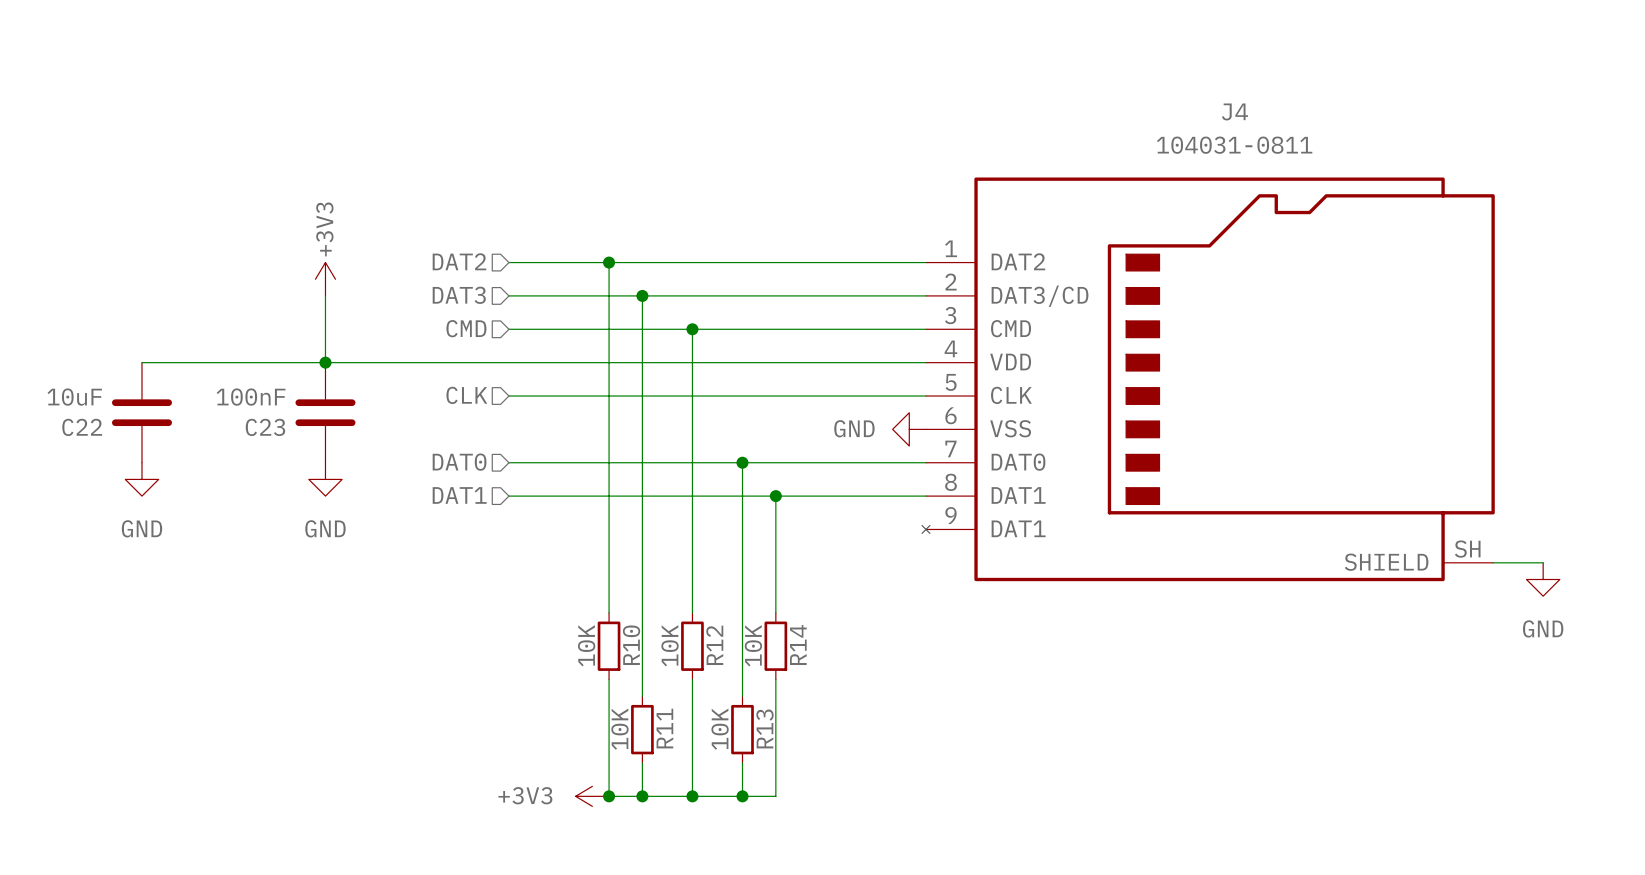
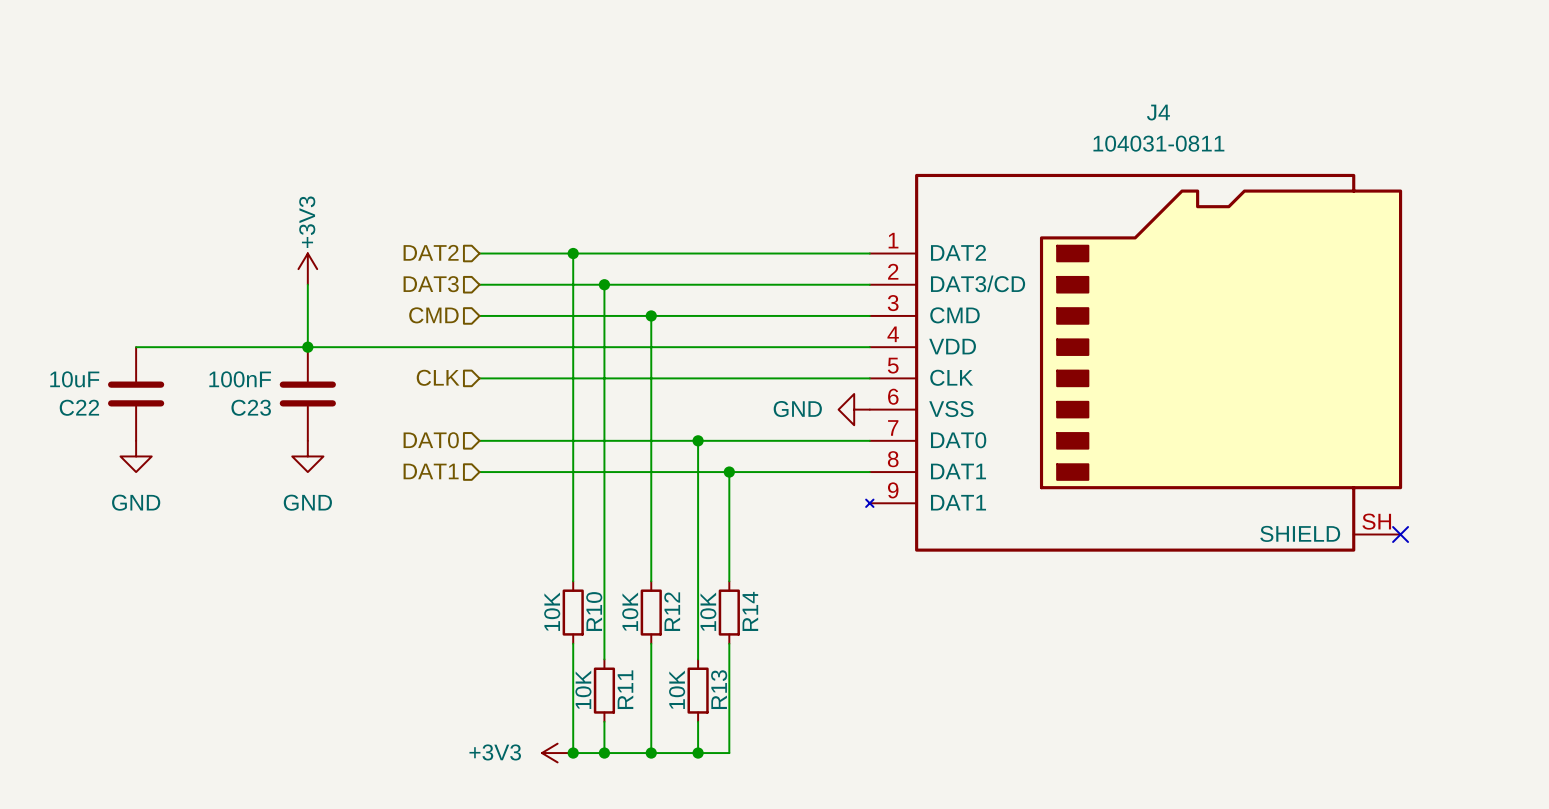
wire: (1493, 562) (1543, 562) -> none
no-connect mark: none -> (1400, 534)
power symbol: GND (1543, 579) -> none

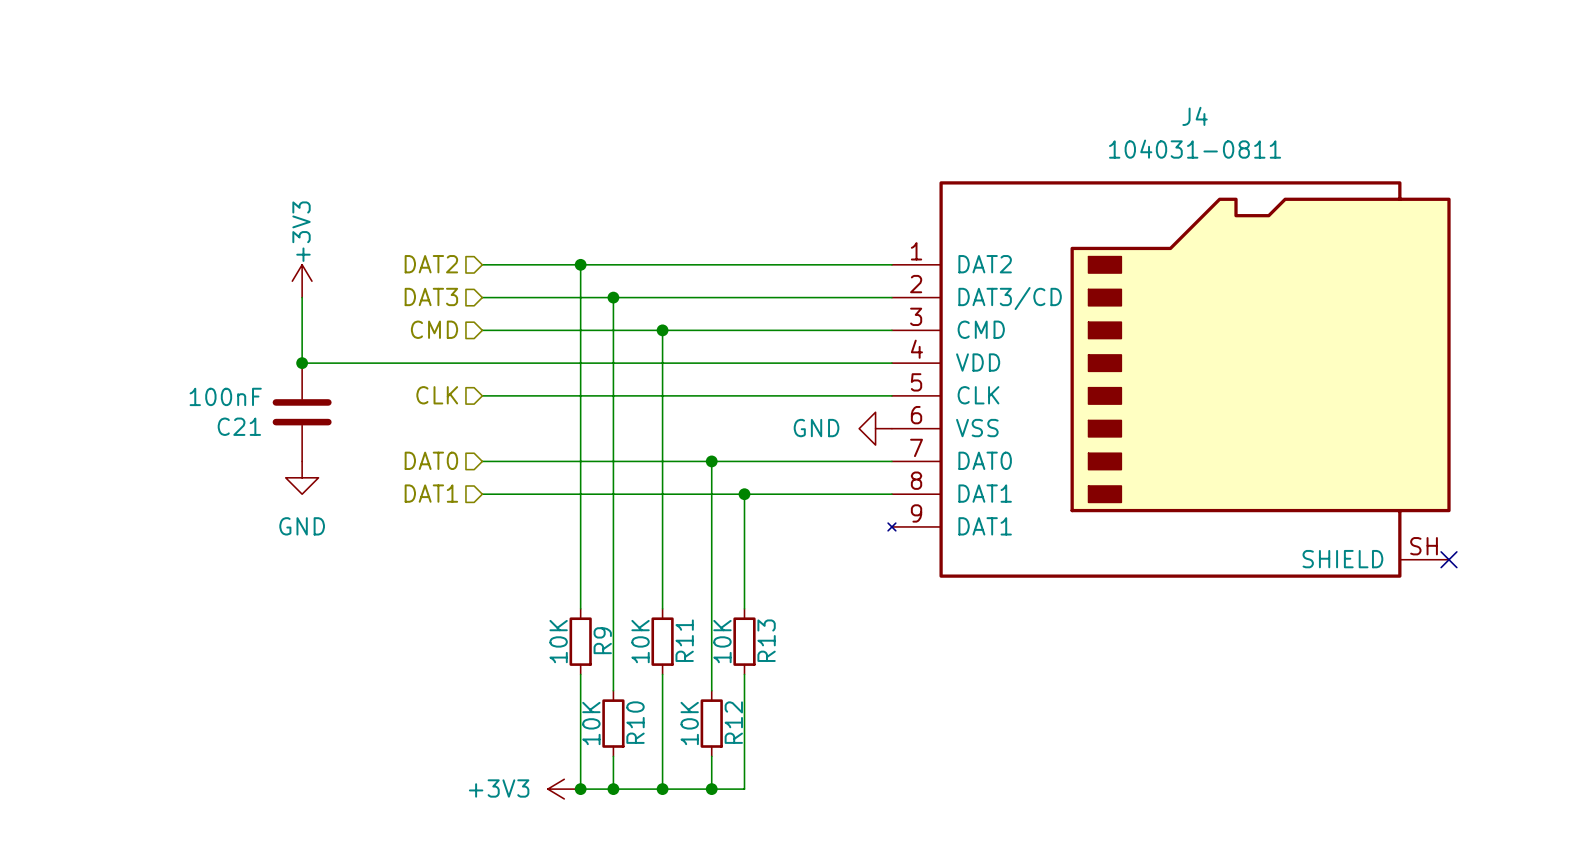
wire: (136, 347) (307, 347) -> none
C22: 10uF (136, 394) -> none
C23 name: C23 (251, 407) -> C21 (239, 426)
power symbol: GND (136, 456) -> none
R10 name: R10 (594, 611) -> R9 (602, 640)
R12 name: R12 (672, 611) -> R11 (684, 640)
R14 name: R14 (750, 611) -> R13 (766, 640)
R11 name: R11 (625, 689) -> R10 (635, 722)
R13 name: R13 (719, 689) -> R12 (733, 722)

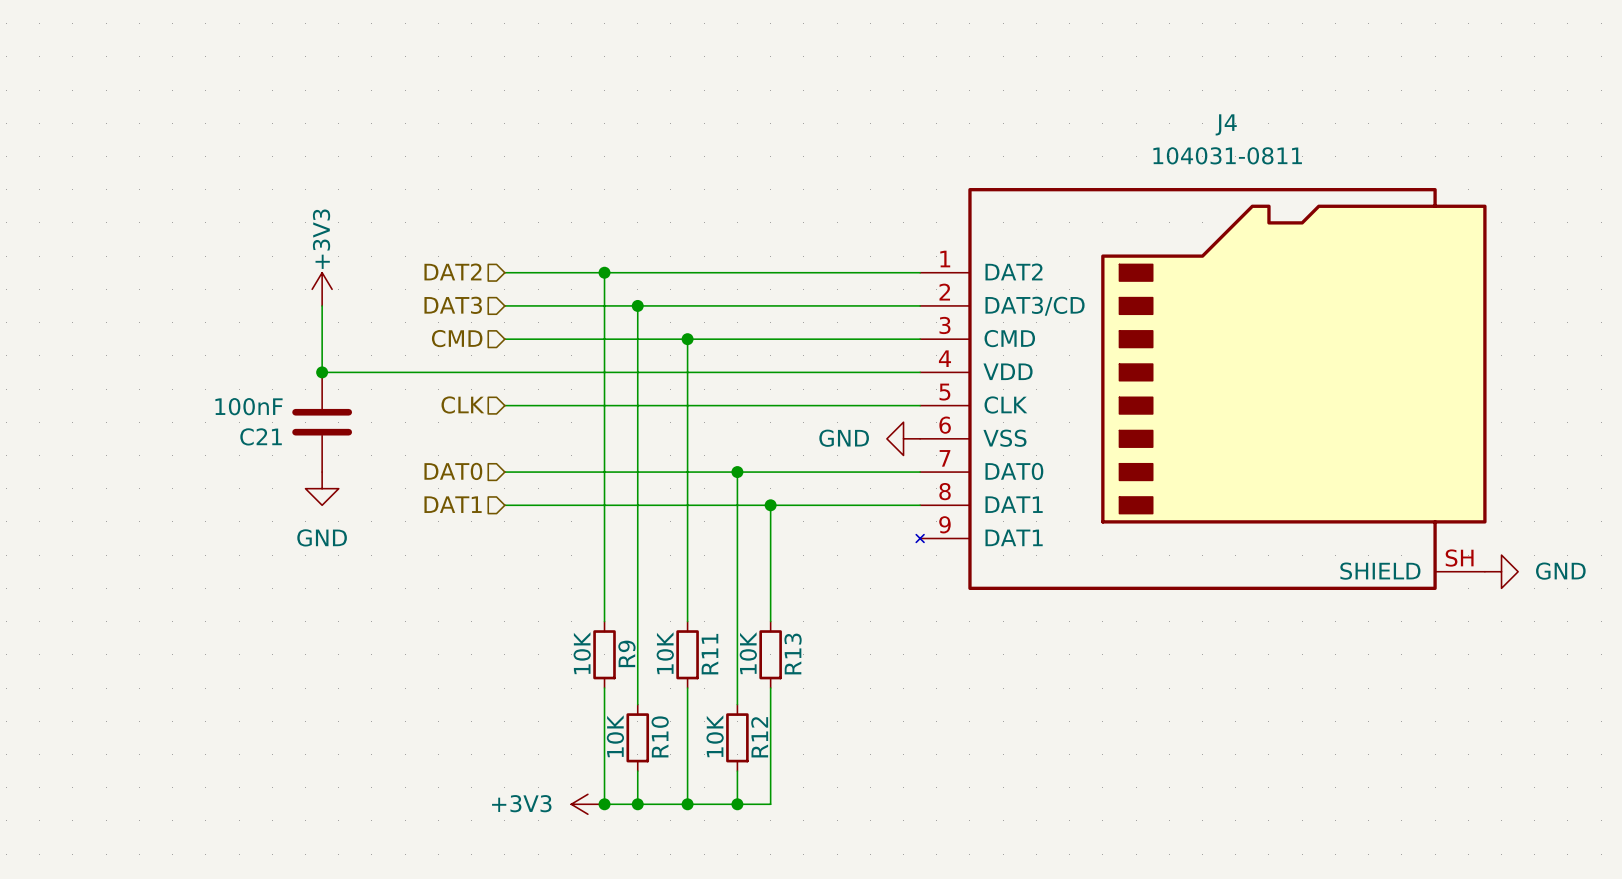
no-connect mark: (1448, 559) -> none
power symbol: none -> GND (1501, 571)

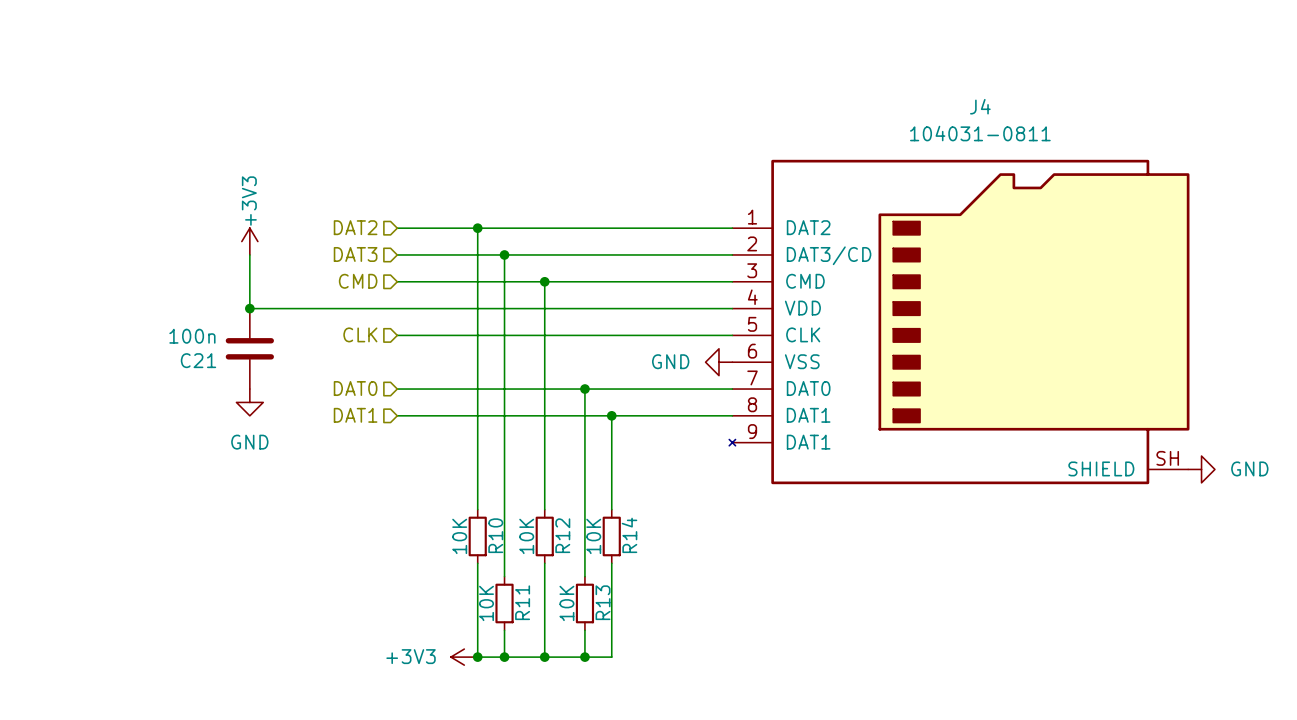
C21 value: 100nF (249, 406) -> 100n (192, 336)
R9 name: R9 (626, 653) -> R10 (495, 535)
R11 name: R11 (709, 654) -> R12 (562, 535)
R13 name: R13 (793, 654) -> R14 (629, 535)
R10 name: R10 (660, 736) -> R11 (522, 602)
R12 name: R12 (759, 737) -> R13 (603, 602)

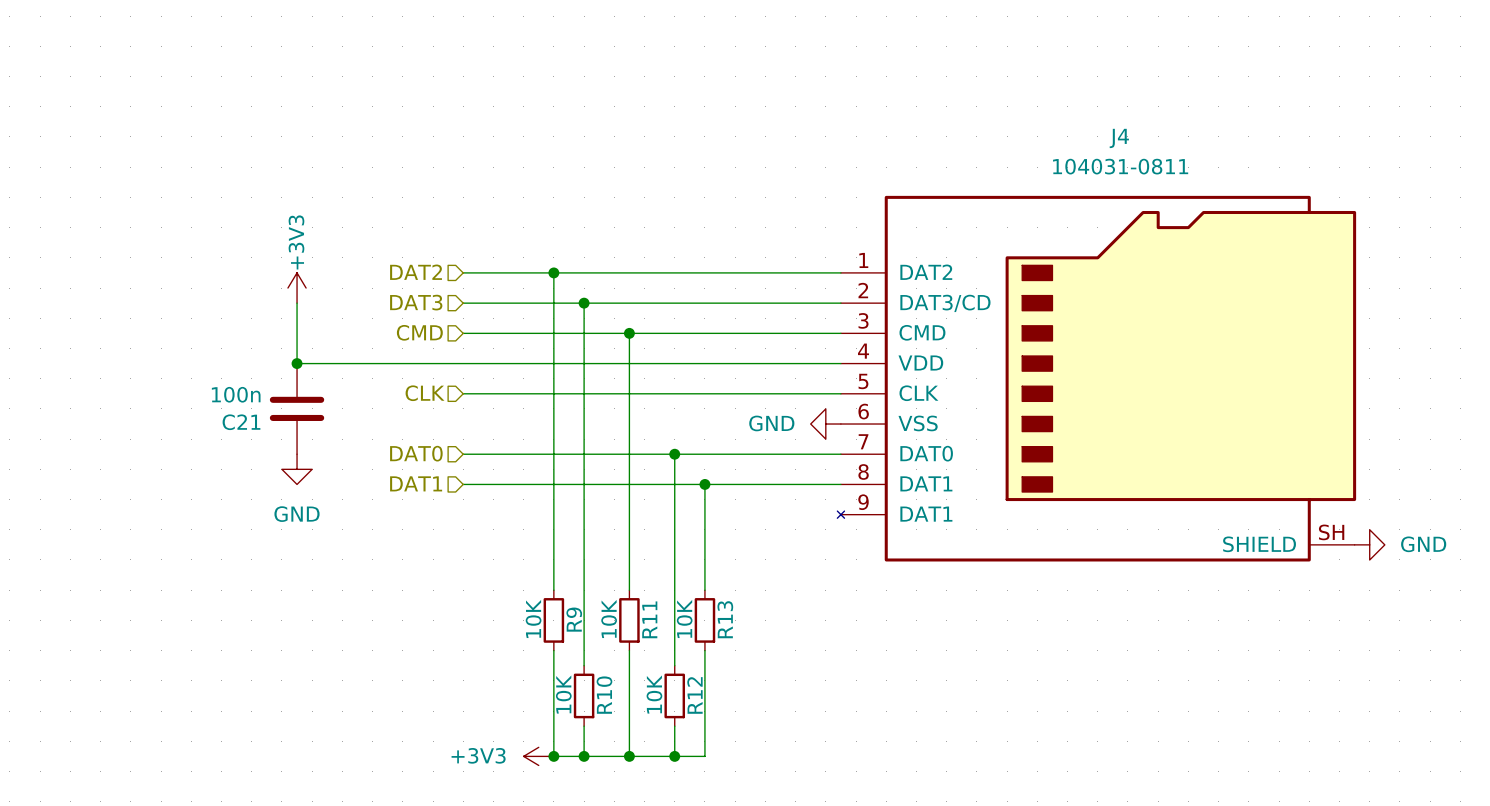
R10 name: R10 (495, 535) -> R9 (574, 619)
R12 name: R12 (562, 535) -> R11 (649, 619)
R14 name: R14 (629, 535) -> R13 (725, 619)
R11 name: R11 (522, 602) -> R10 (604, 695)
R13 name: R13 (603, 602) -> R12 (694, 695)

